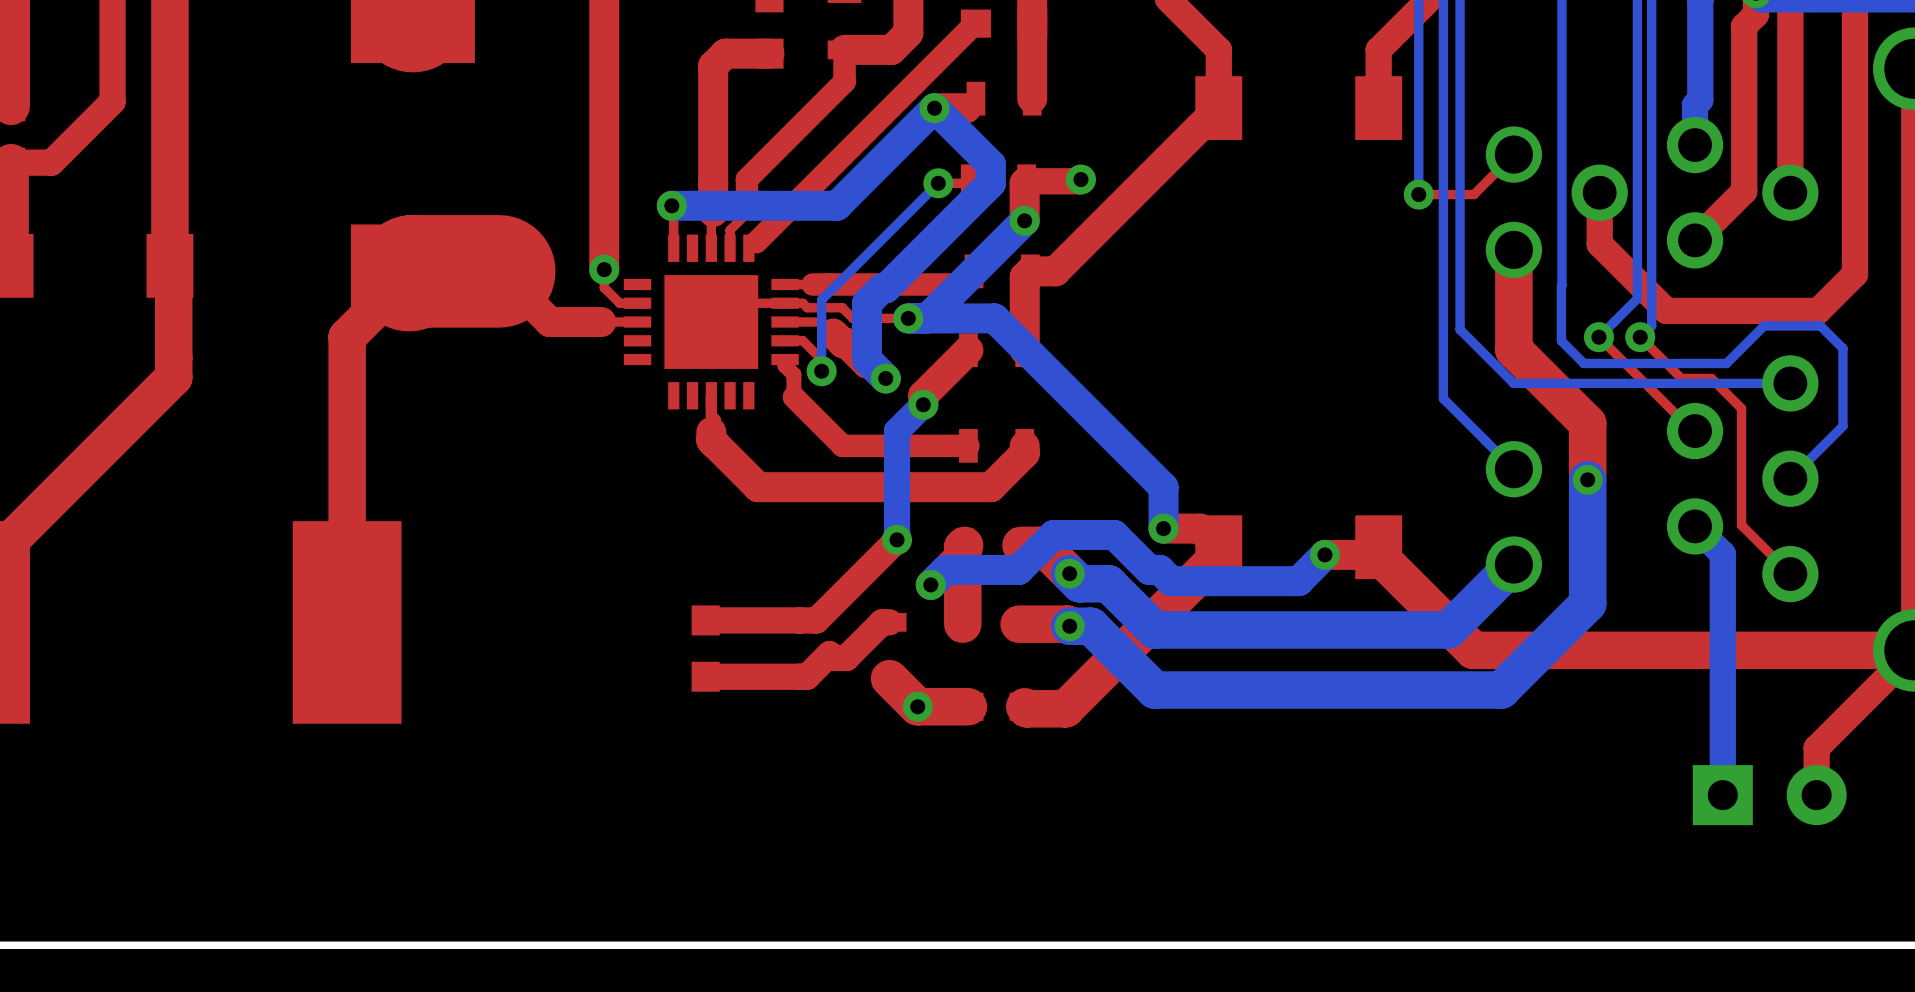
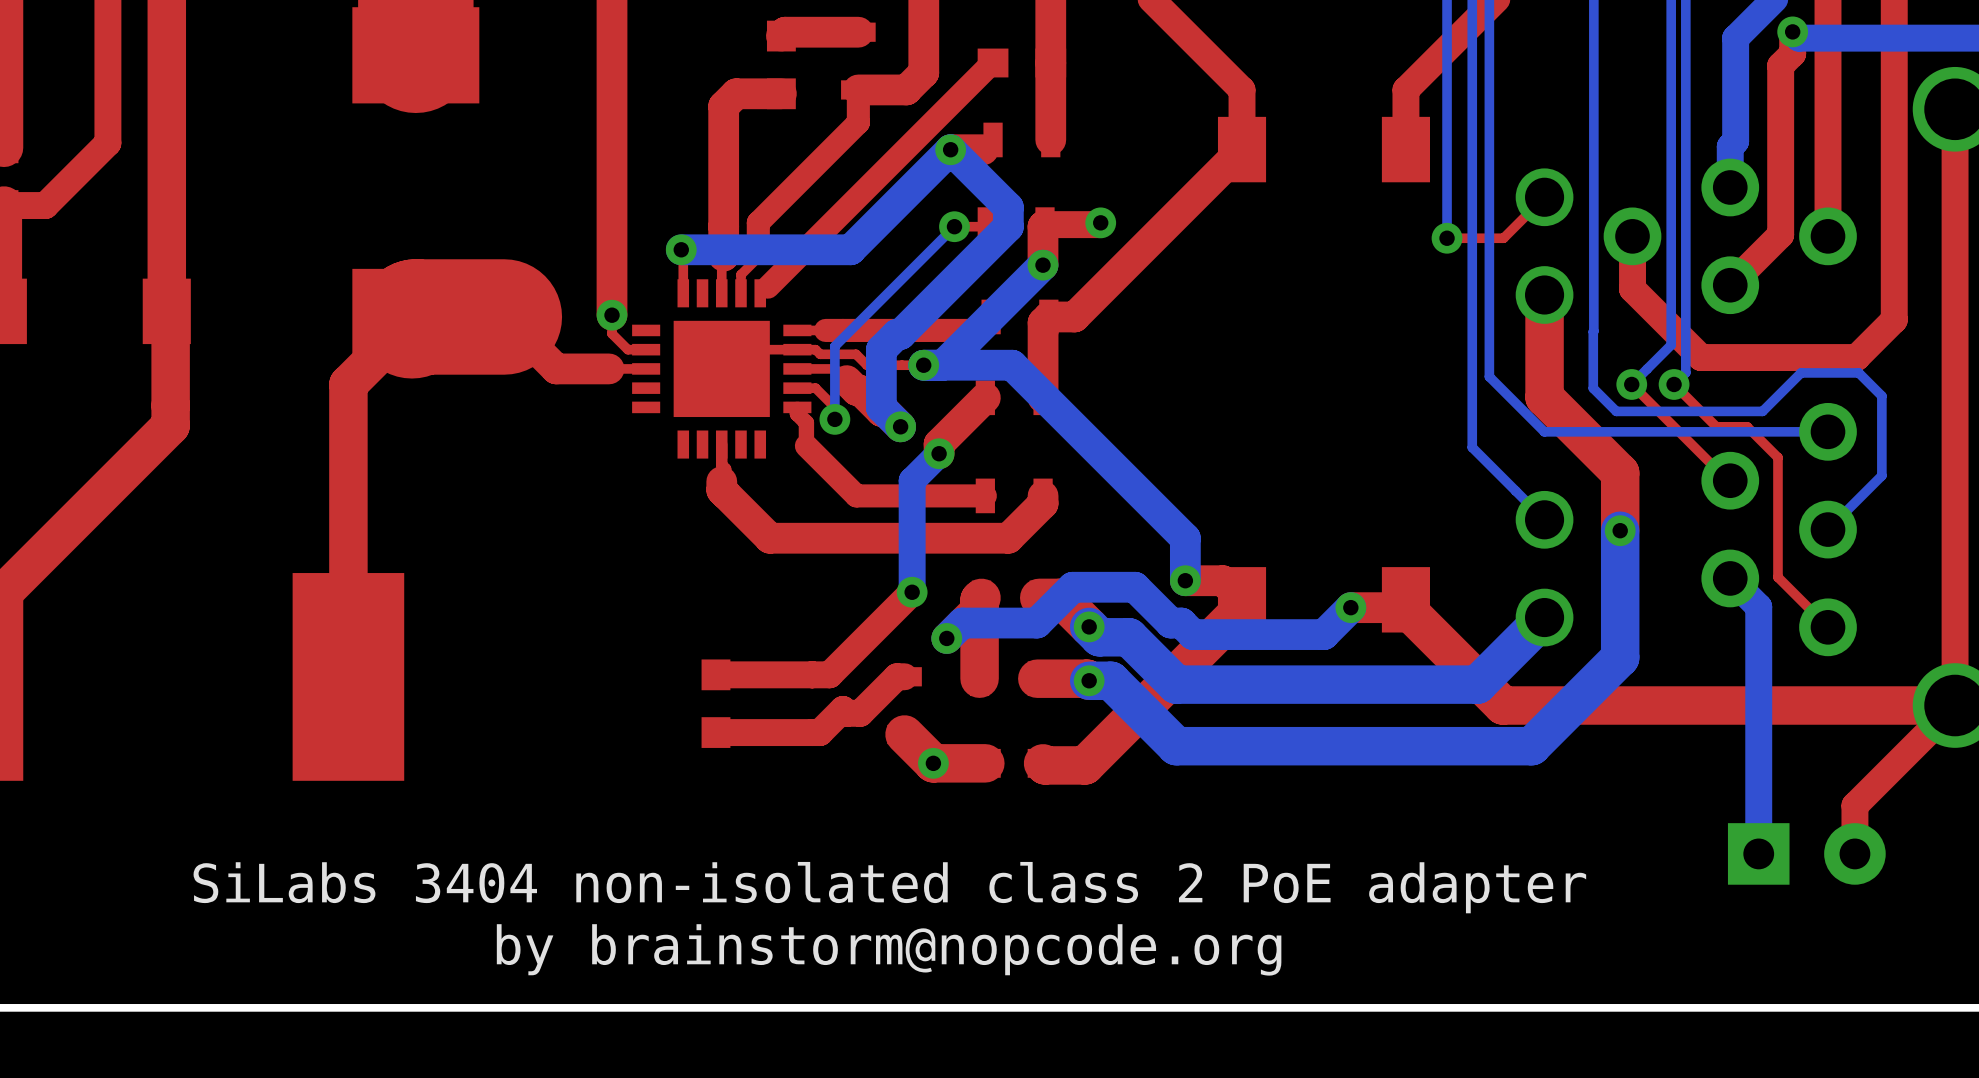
text: none -> SiLabs 3404 non-isolated class 2 PoE adapter (889, 887)
text: none -> by brainstorm@nopcode.org (889, 949)

